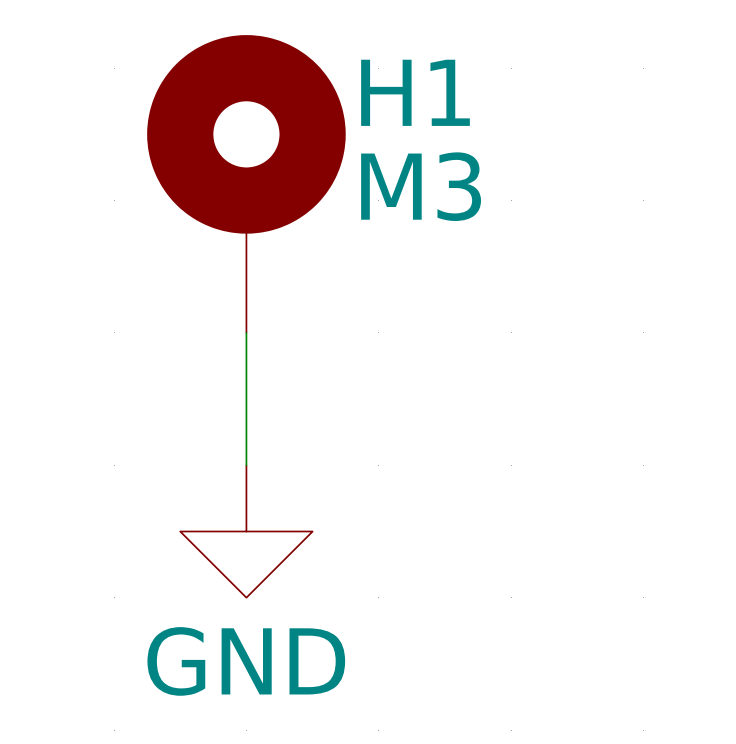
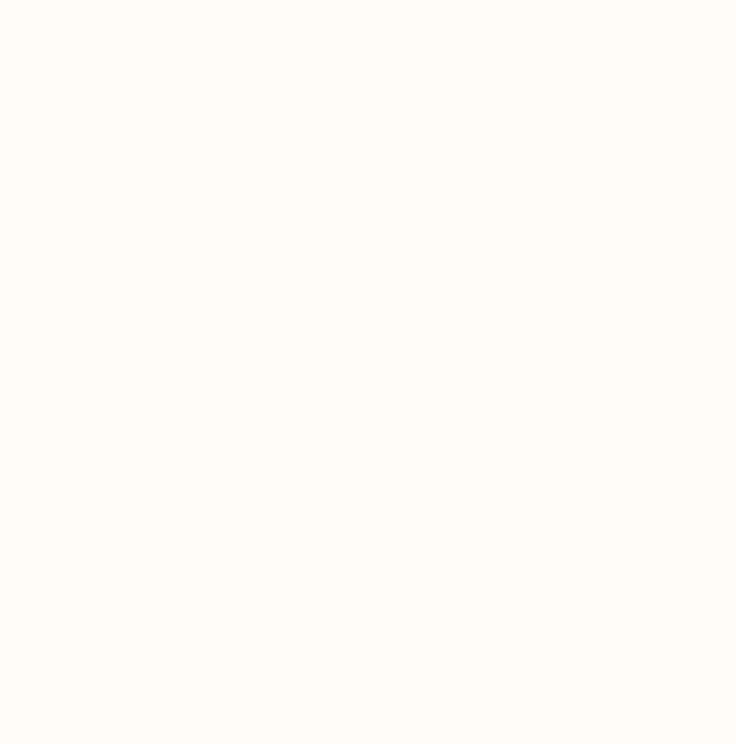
H1: M3 (246, 184) -> none
wire: (246, 332) (246, 465) -> none
power symbol: GND (246, 531) -> none

